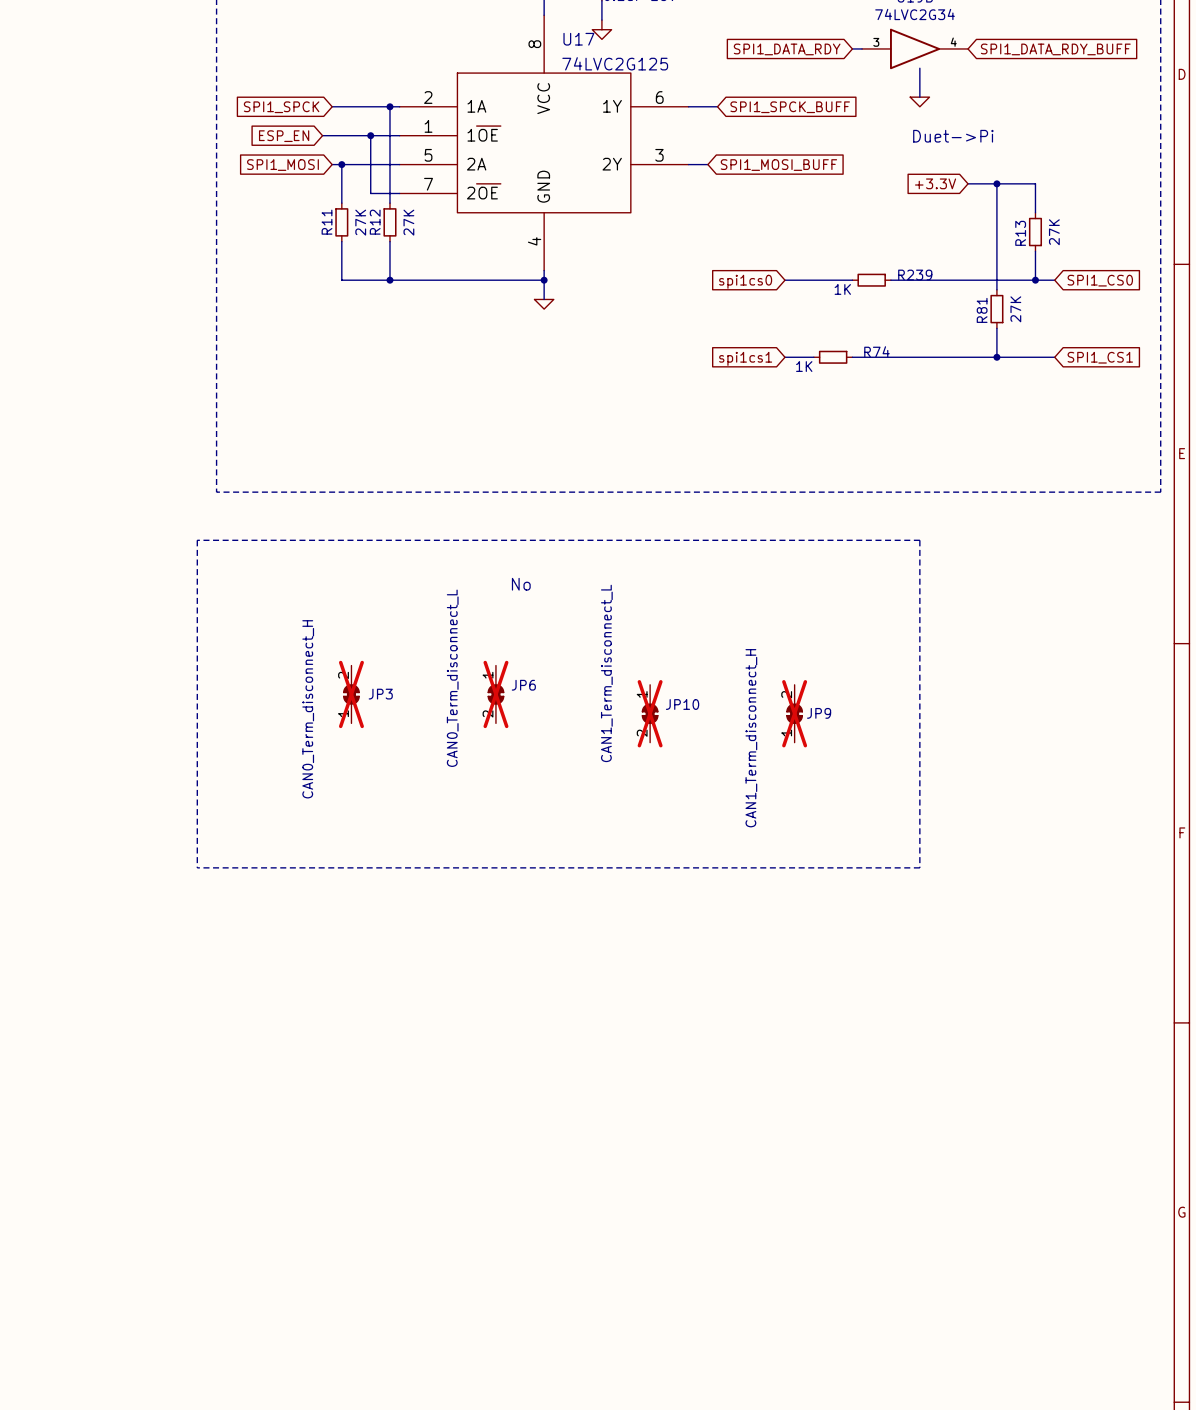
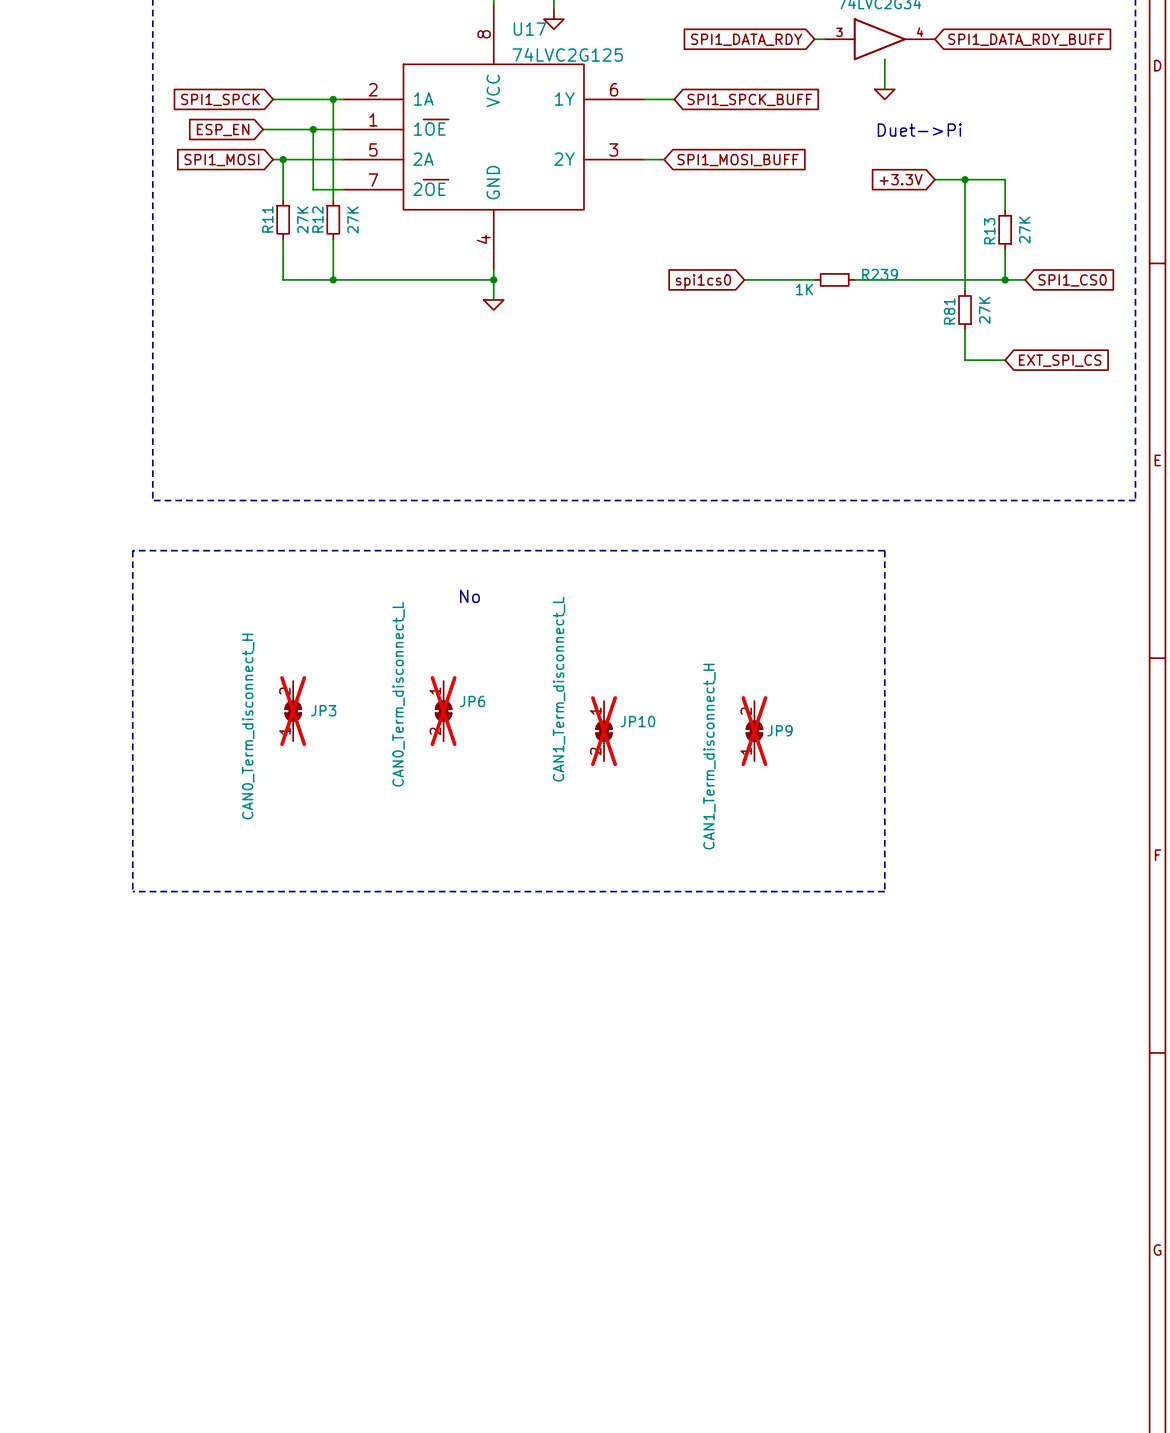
wire: (784, 357) (813, 357) -> none
R74: 1K (833, 357) -> none
wire: (852, 357) (996, 357) -> none
junction: (996, 357) -> none
wire: (1035, 357) (1054, 357) -> none
global label: SPI1_CS1 (1100, 357) -> EXT_SPI_CS (1060, 360)
global label: spi1cs1 (745, 358) -> none

